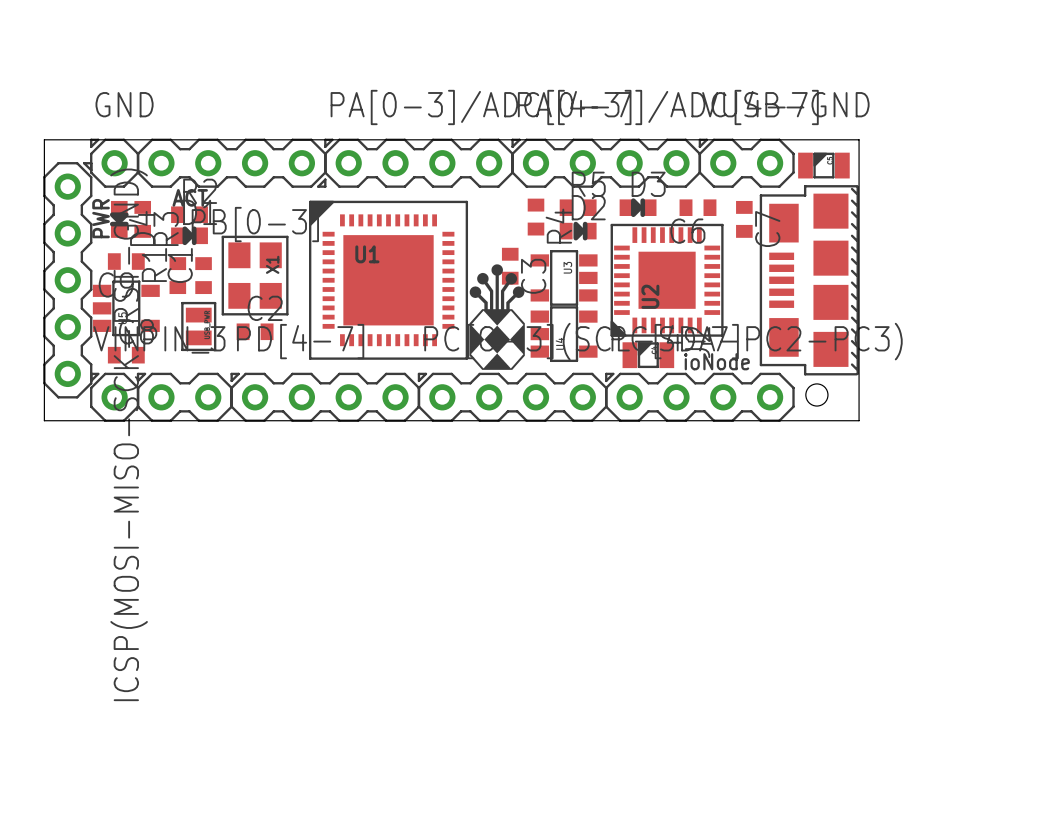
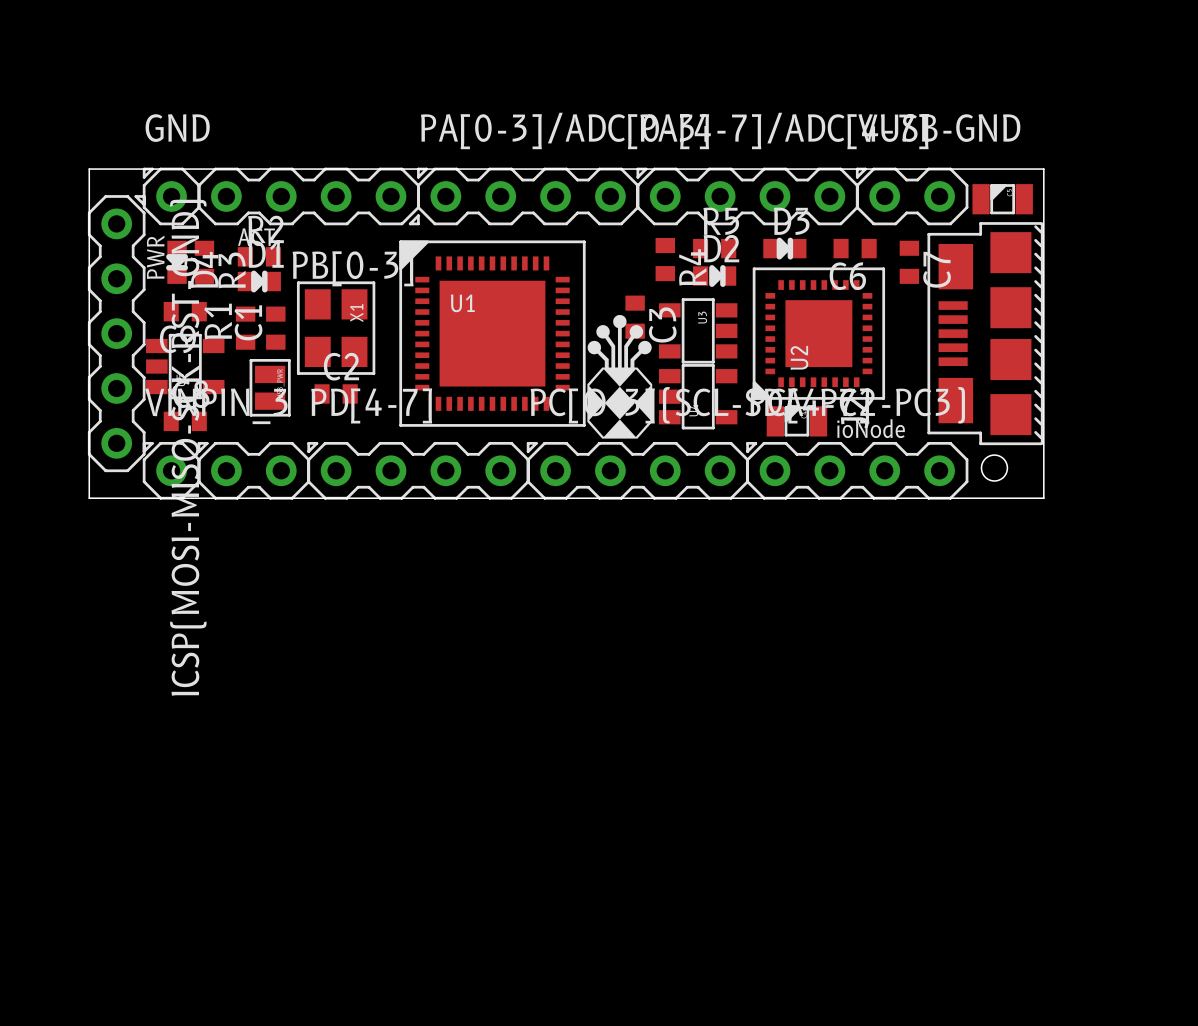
U2 footprint: [610, 223, 724, 337] -> [752, 267, 886, 400]

